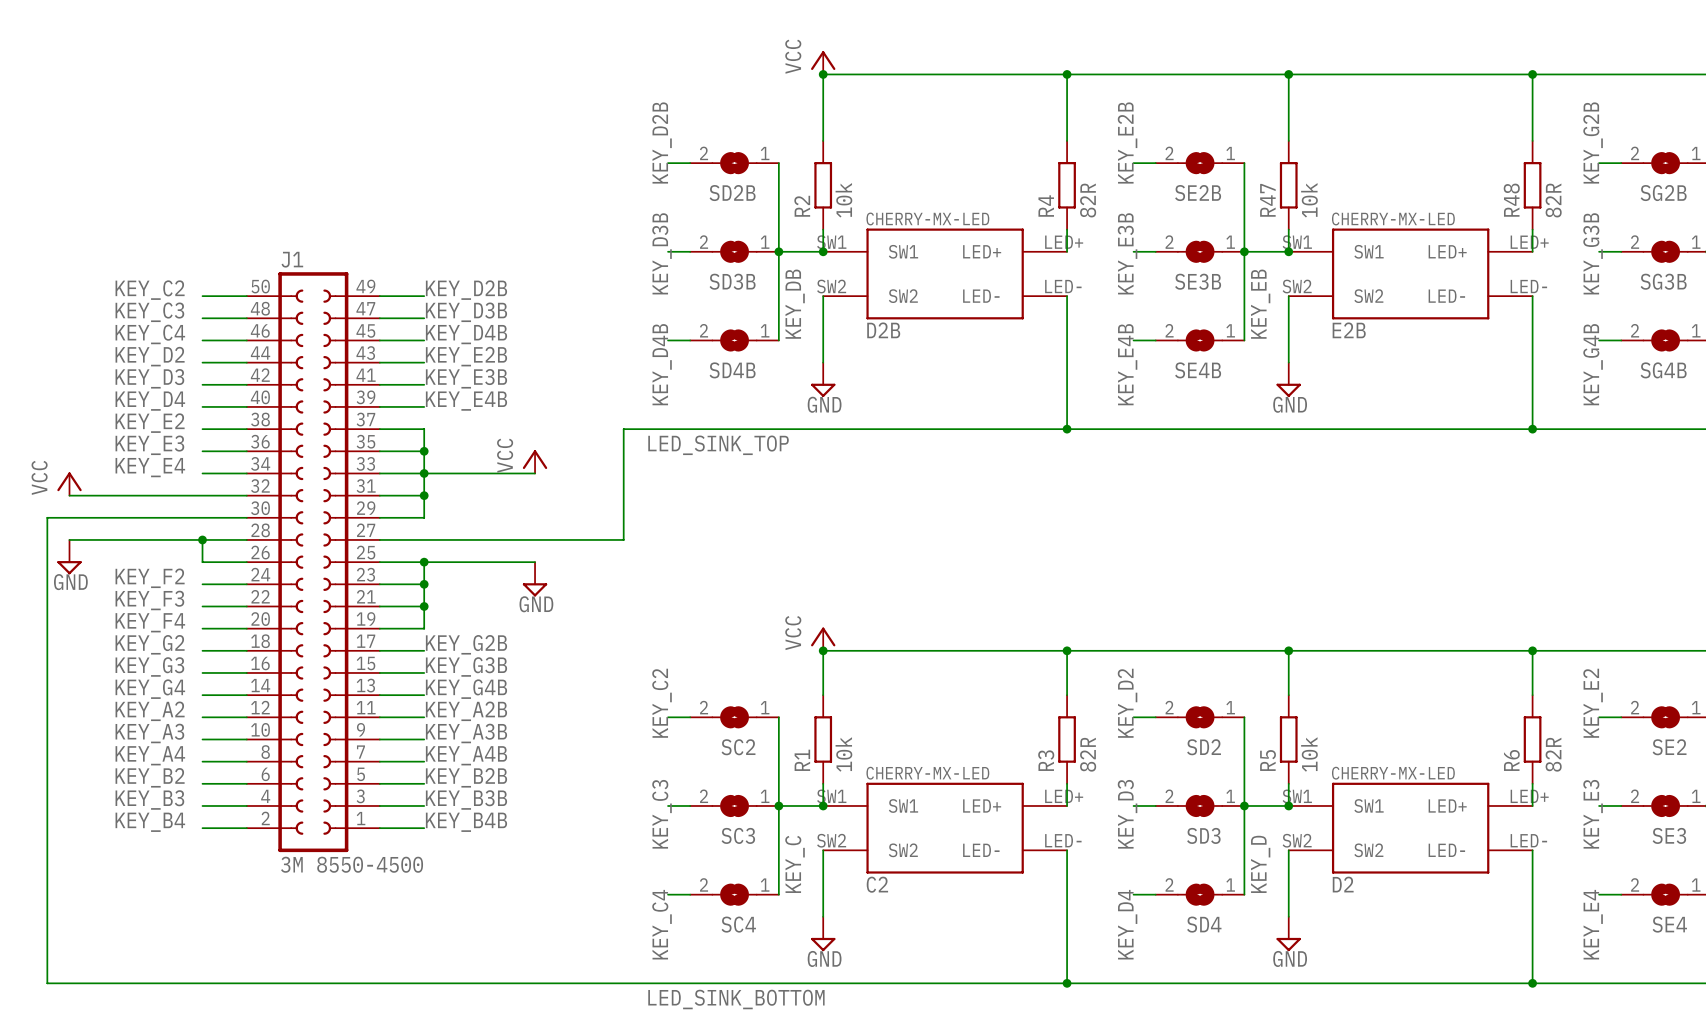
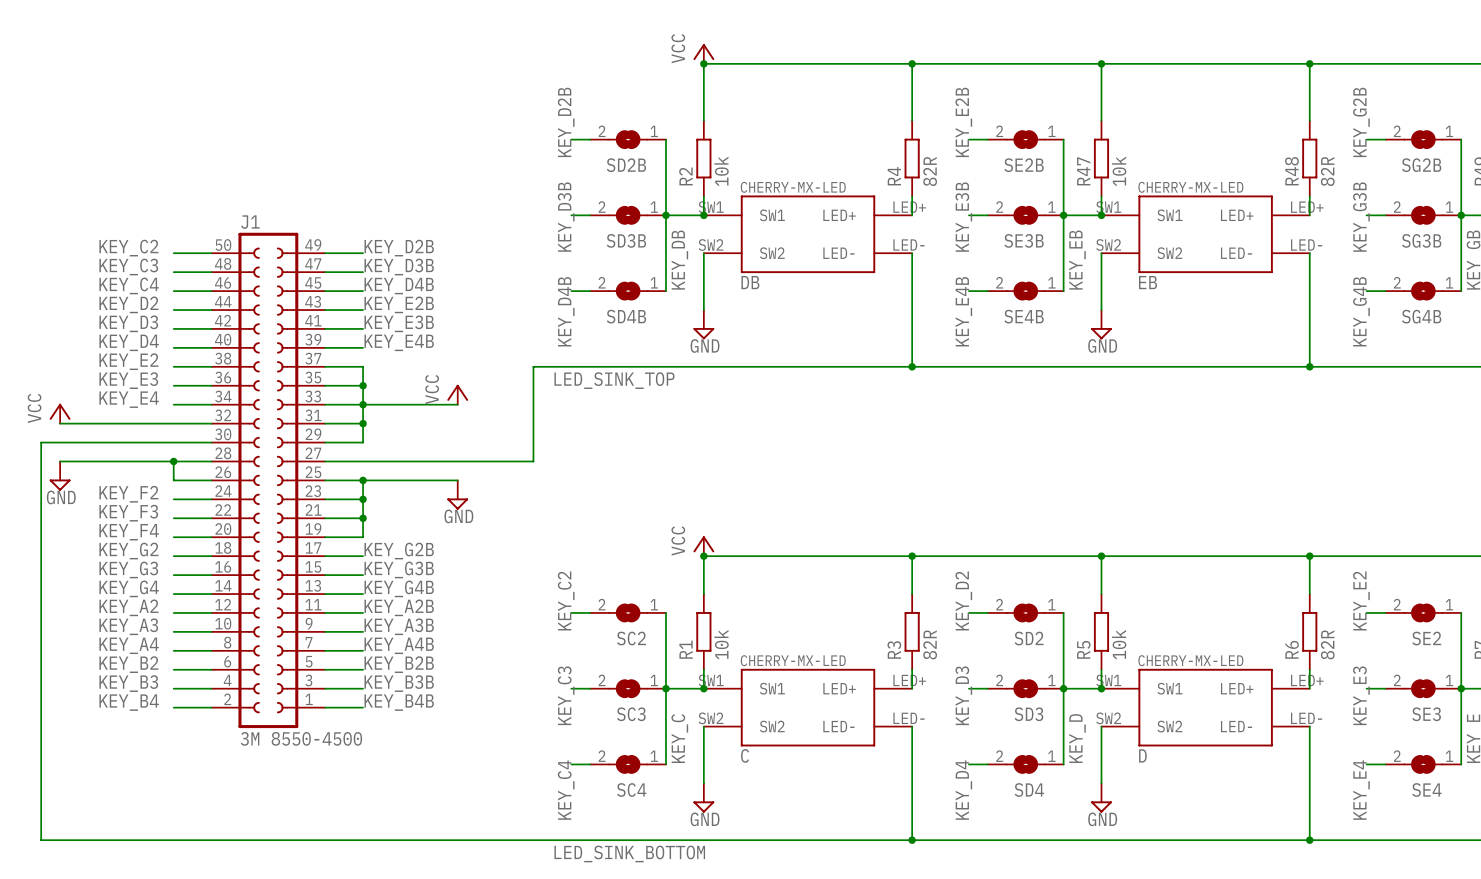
D2B name: D2B (883, 330) -> DB (750, 282)
E2B name: E2B (1349, 330) -> EB (1147, 282)
C2 name: C2 (877, 884) -> C (745, 755)
D2 name: D2 (1343, 884) -> D (1142, 755)

